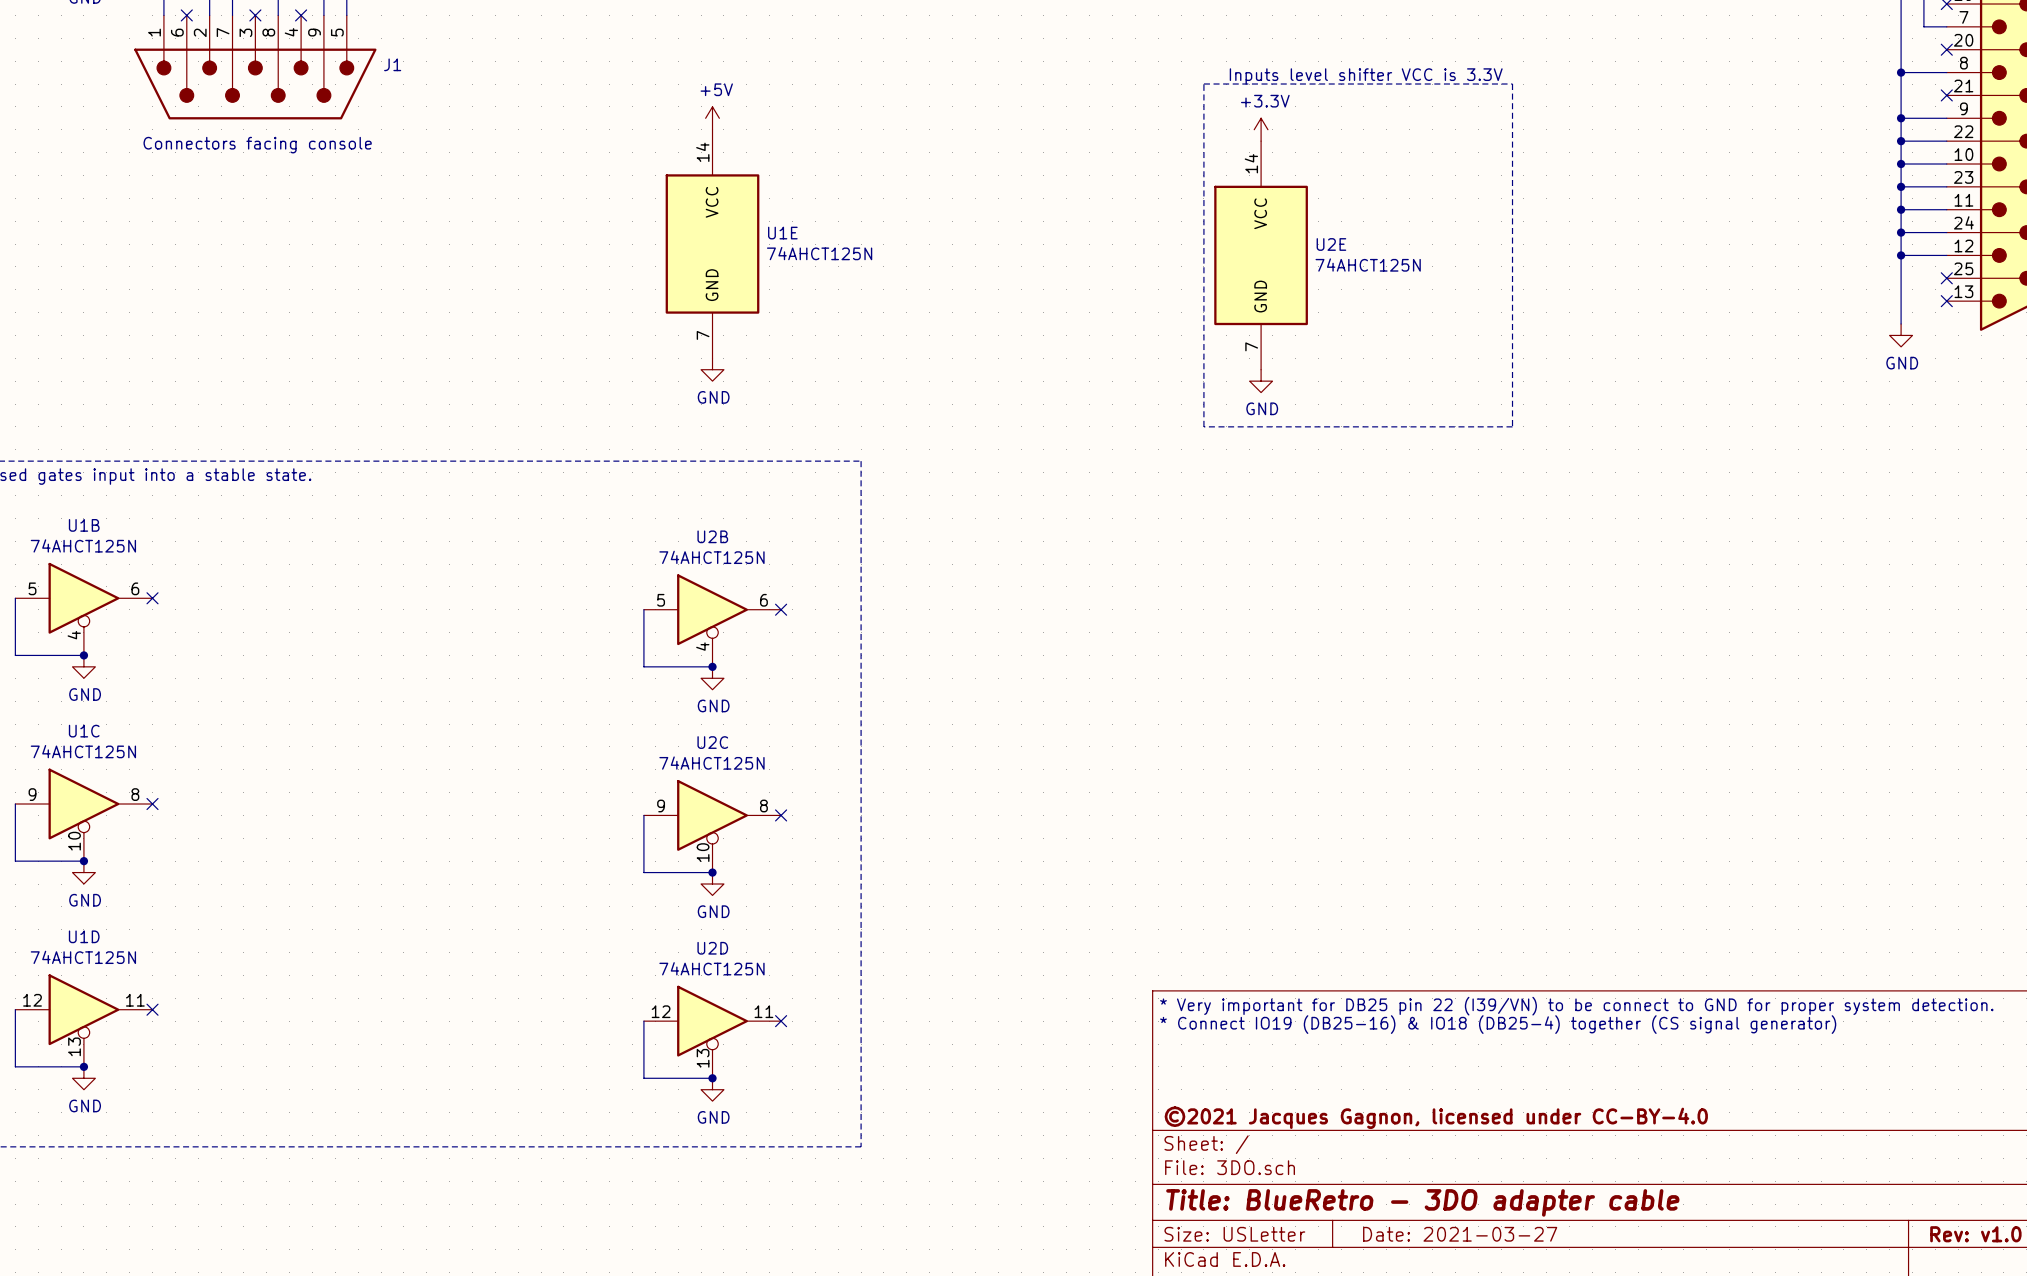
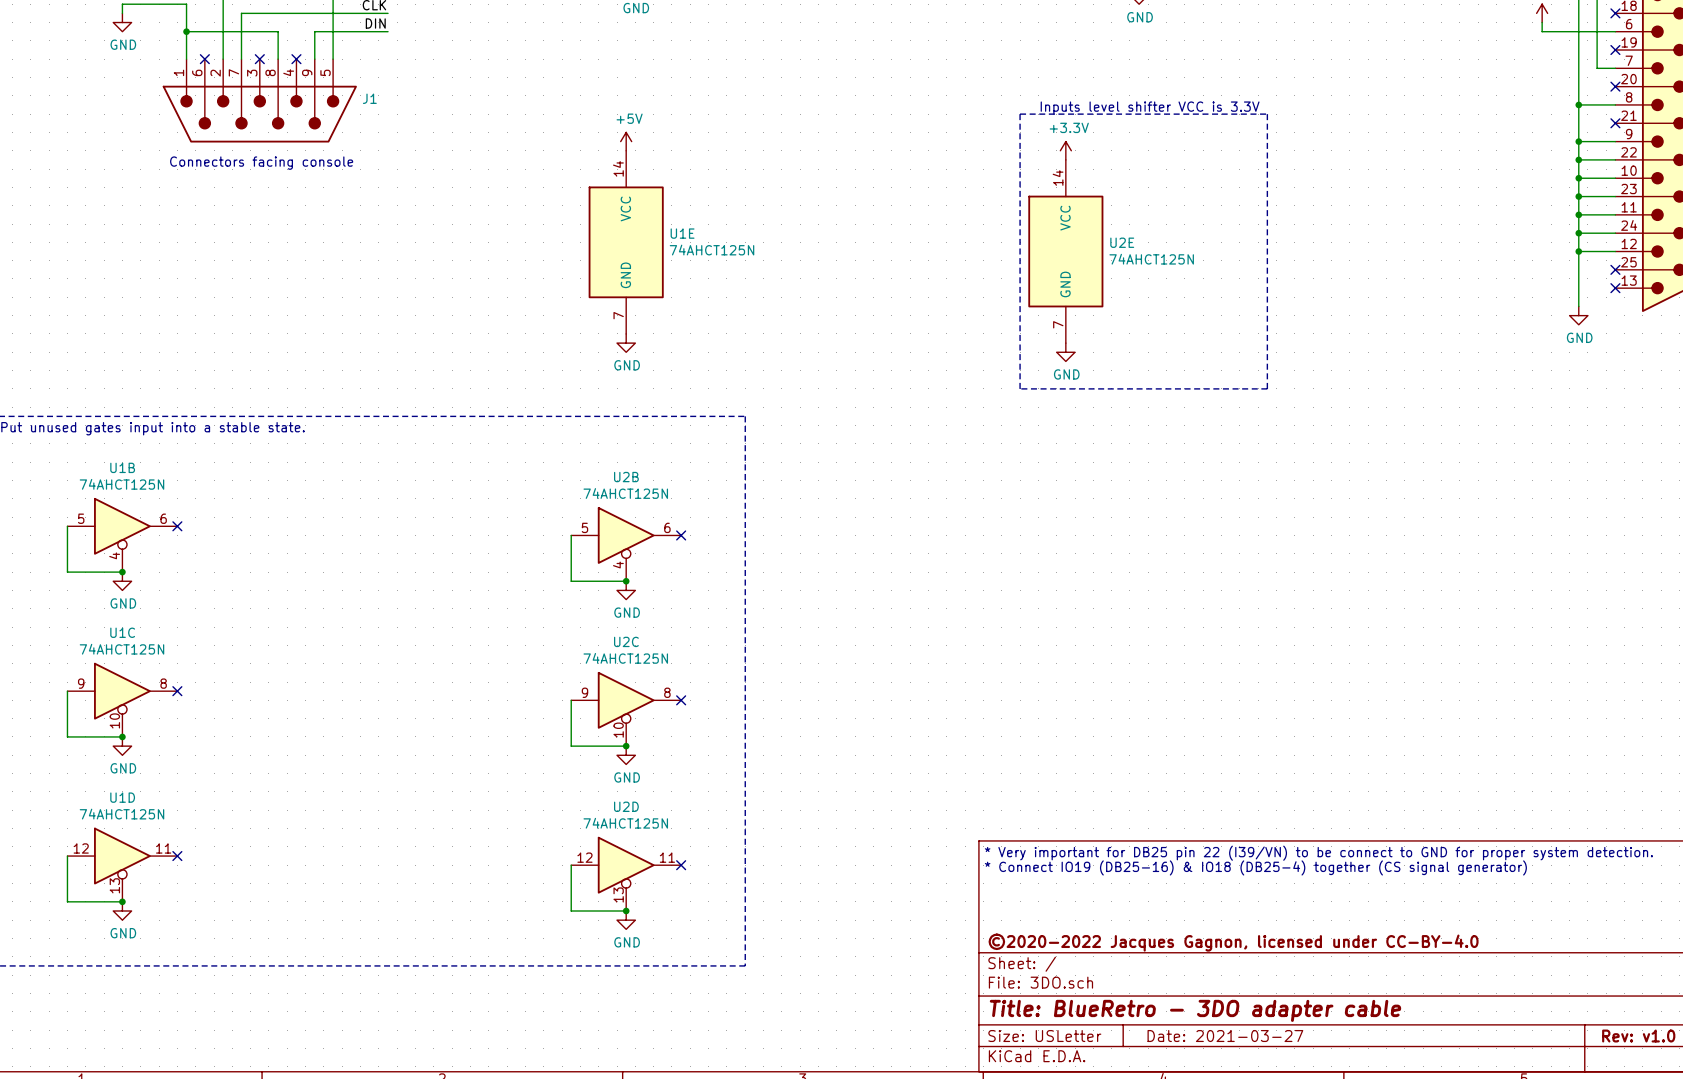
title block: ©2021 Jacques Gagnon, licensed under CC-BY-4.0 (1436, 1117) -> ©2020-2022 Jacques Gagnon, licensed under CC-BY-4.0 (1233, 942)

